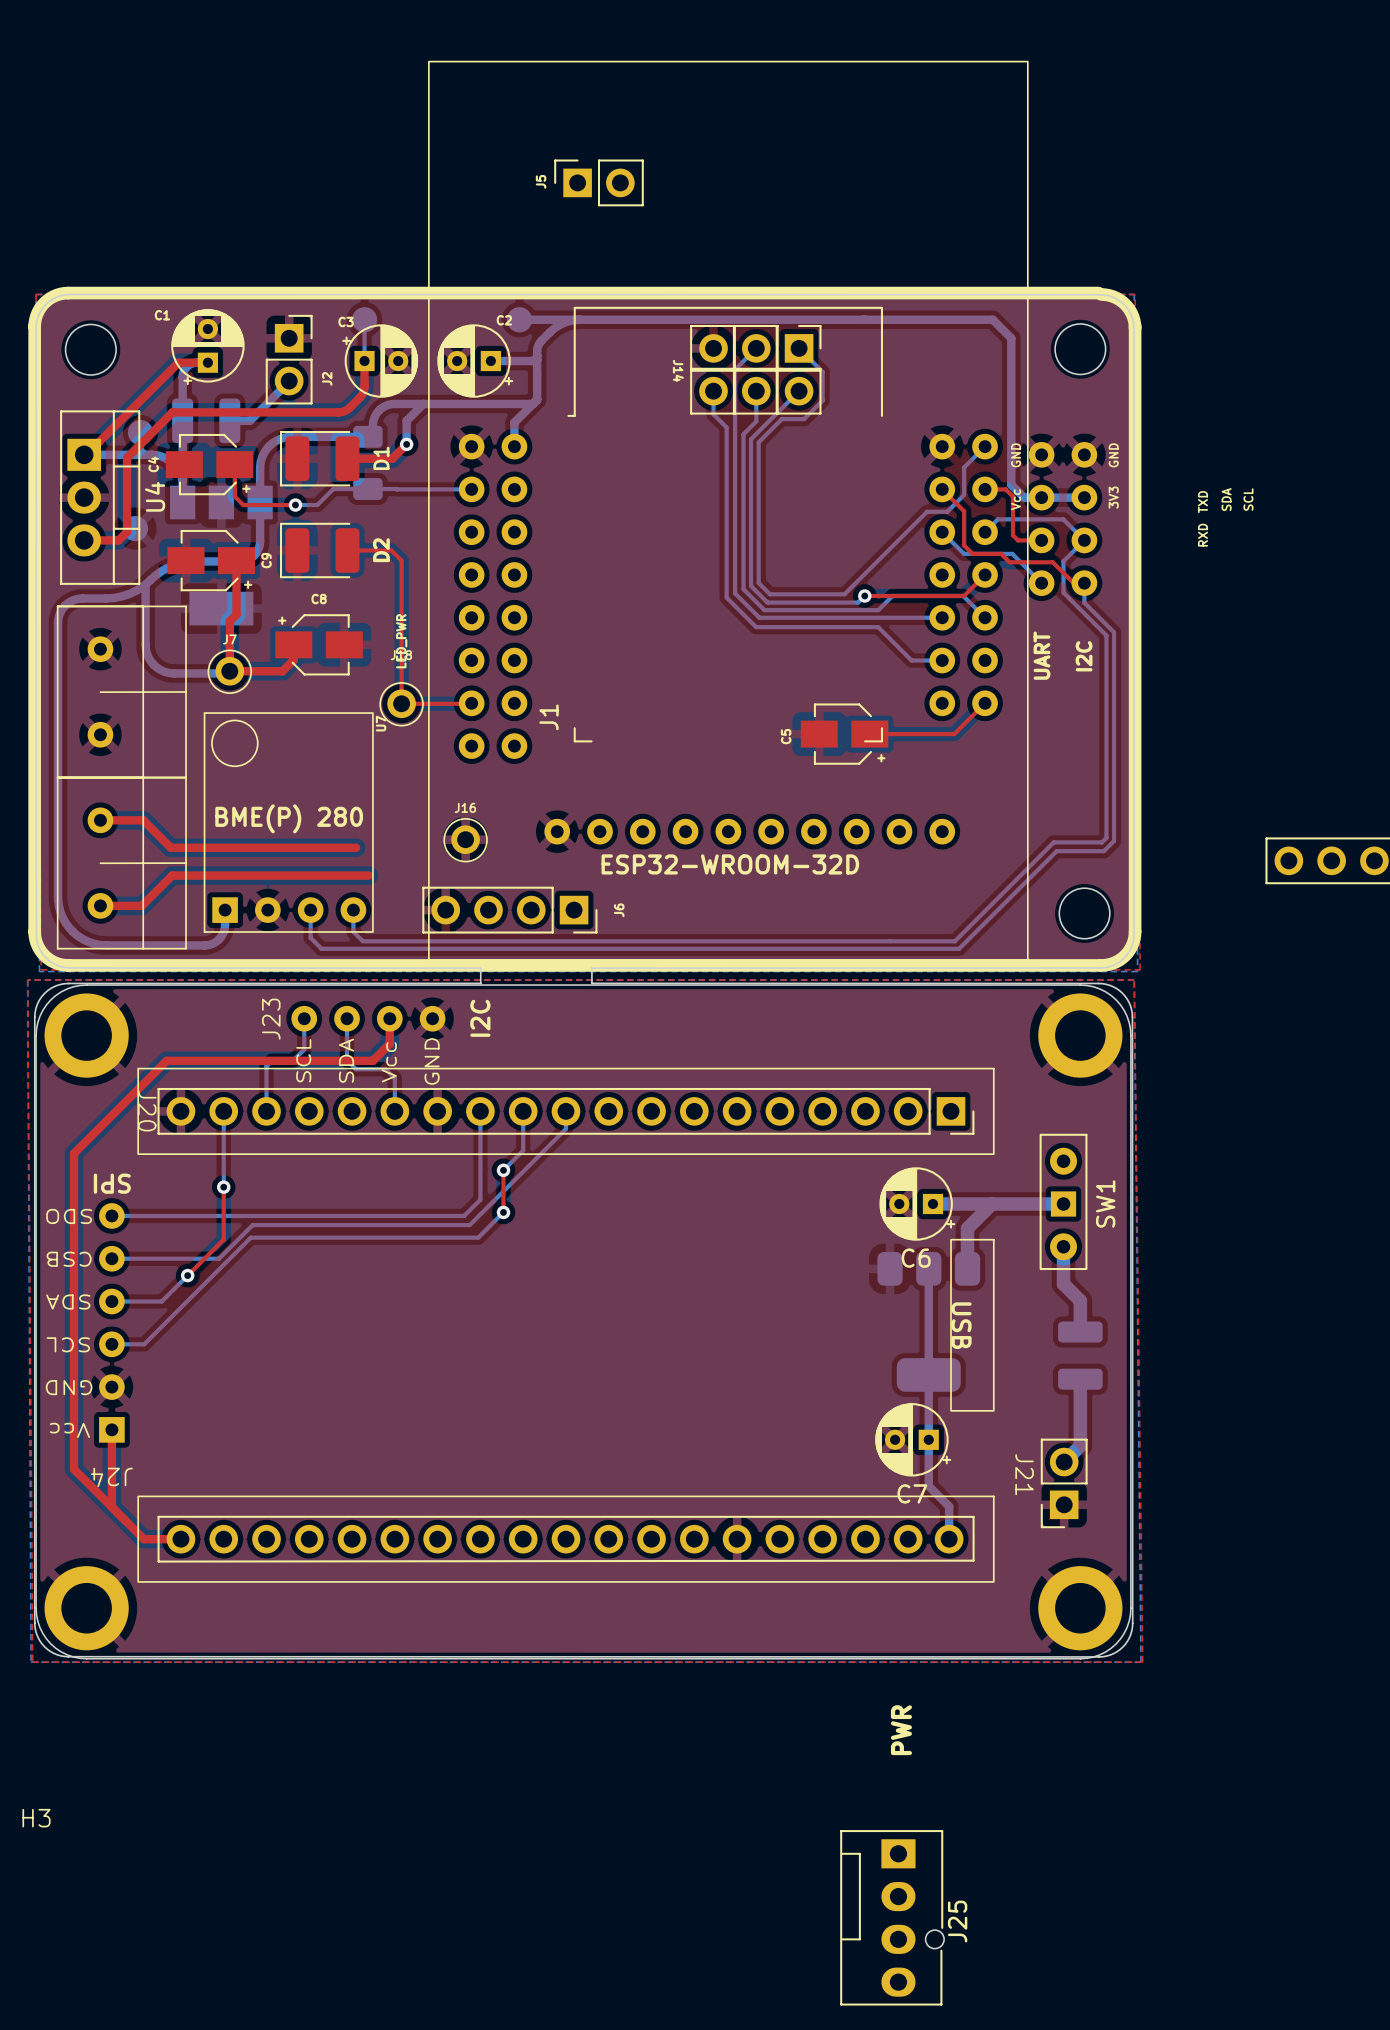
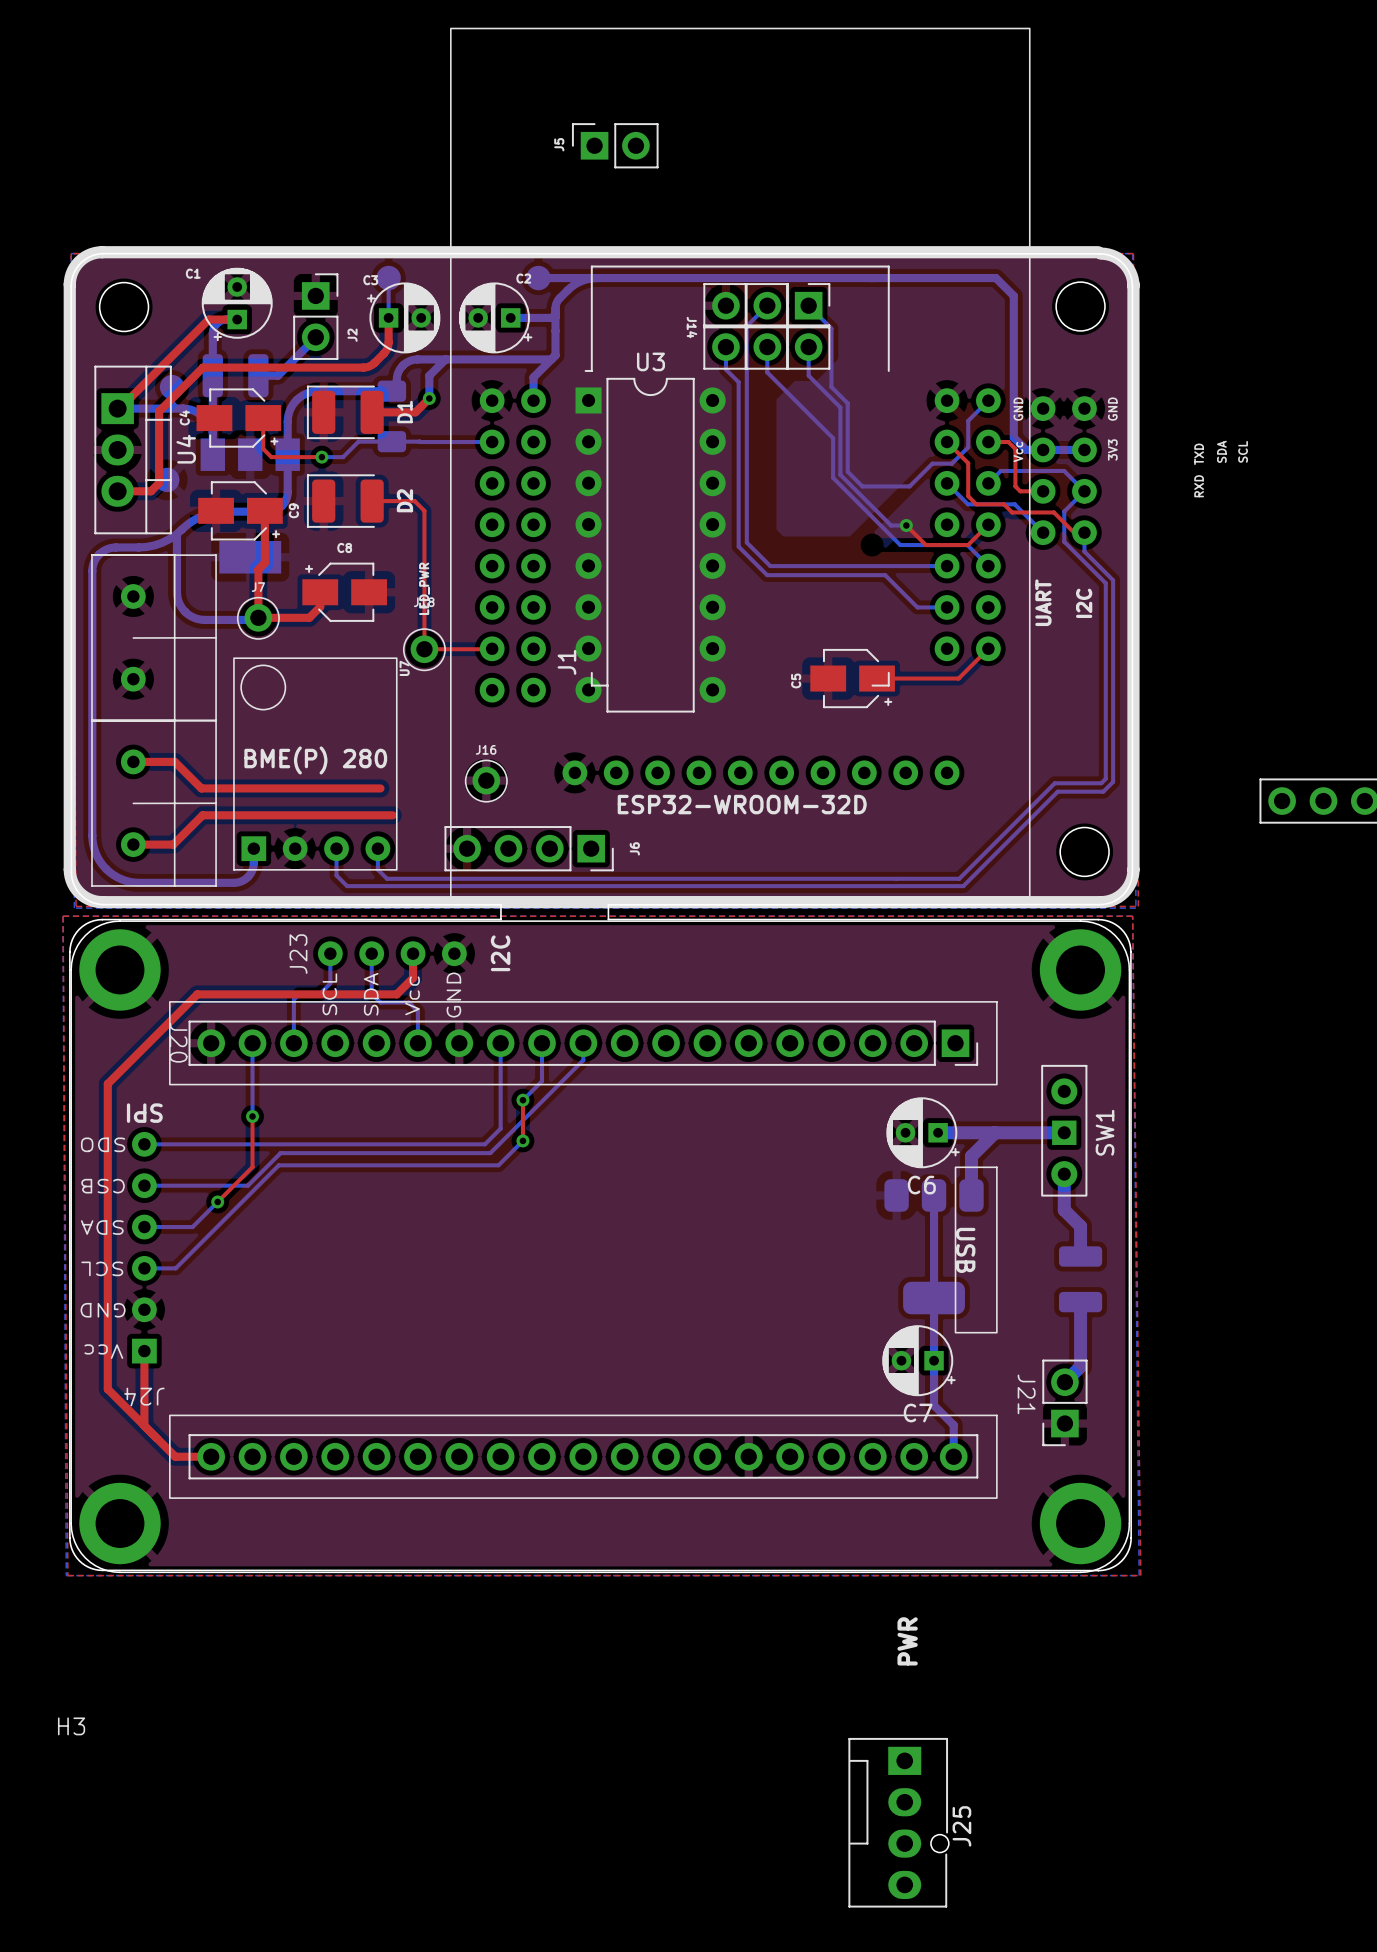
bottom track: (799, 391) (751, 439) (751, 586) (767, 602) (858, 602) (864, 595) -> (808, 347) (808, 375) (840, 407) (840, 474) (891, 525) (906, 525)
bottom track: (822, 400) (804, 419) (781, 419) (758, 442) (758, 582) (769, 594) (844, 594) (903, 535) -> (831, 356) (831, 387) (847, 403) (847, 471) (862, 486) (909, 486)
bottom track: (756, 417) (756, 421) (743, 434) (743, 589) (764, 610) (878, 610) (893, 595) -> (767, 372) (833, 438) (833, 477) (900, 545)
top track: (864, 595) (920, 595) -> (906, 525) (925, 545)
via position: (864, 595) -> (906, 525)
U3: none -> (650, 545)

